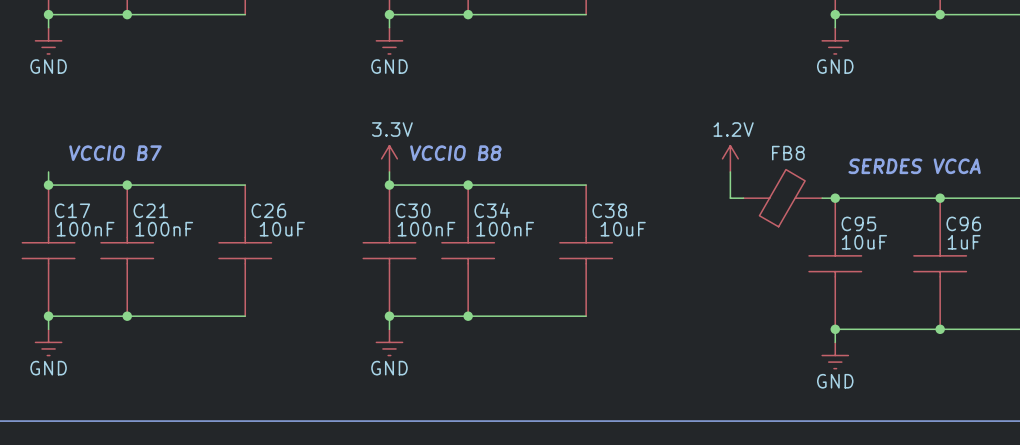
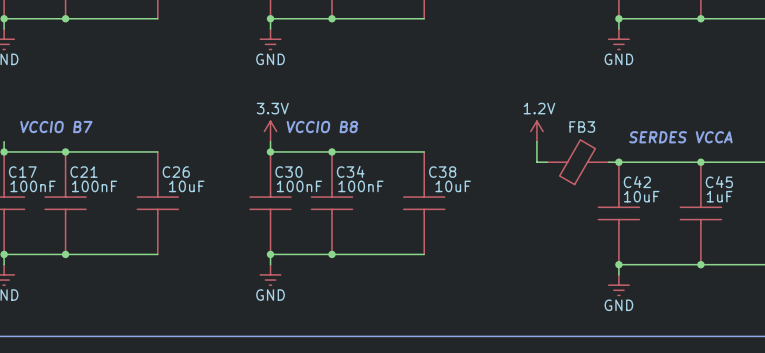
FB8 name: FB8 (788, 153) -> FB3 (582, 126)
C95 name: C95 (858, 223) -> C42 (637, 182)
C96 name: C96 (963, 223) -> C45 (719, 182)

